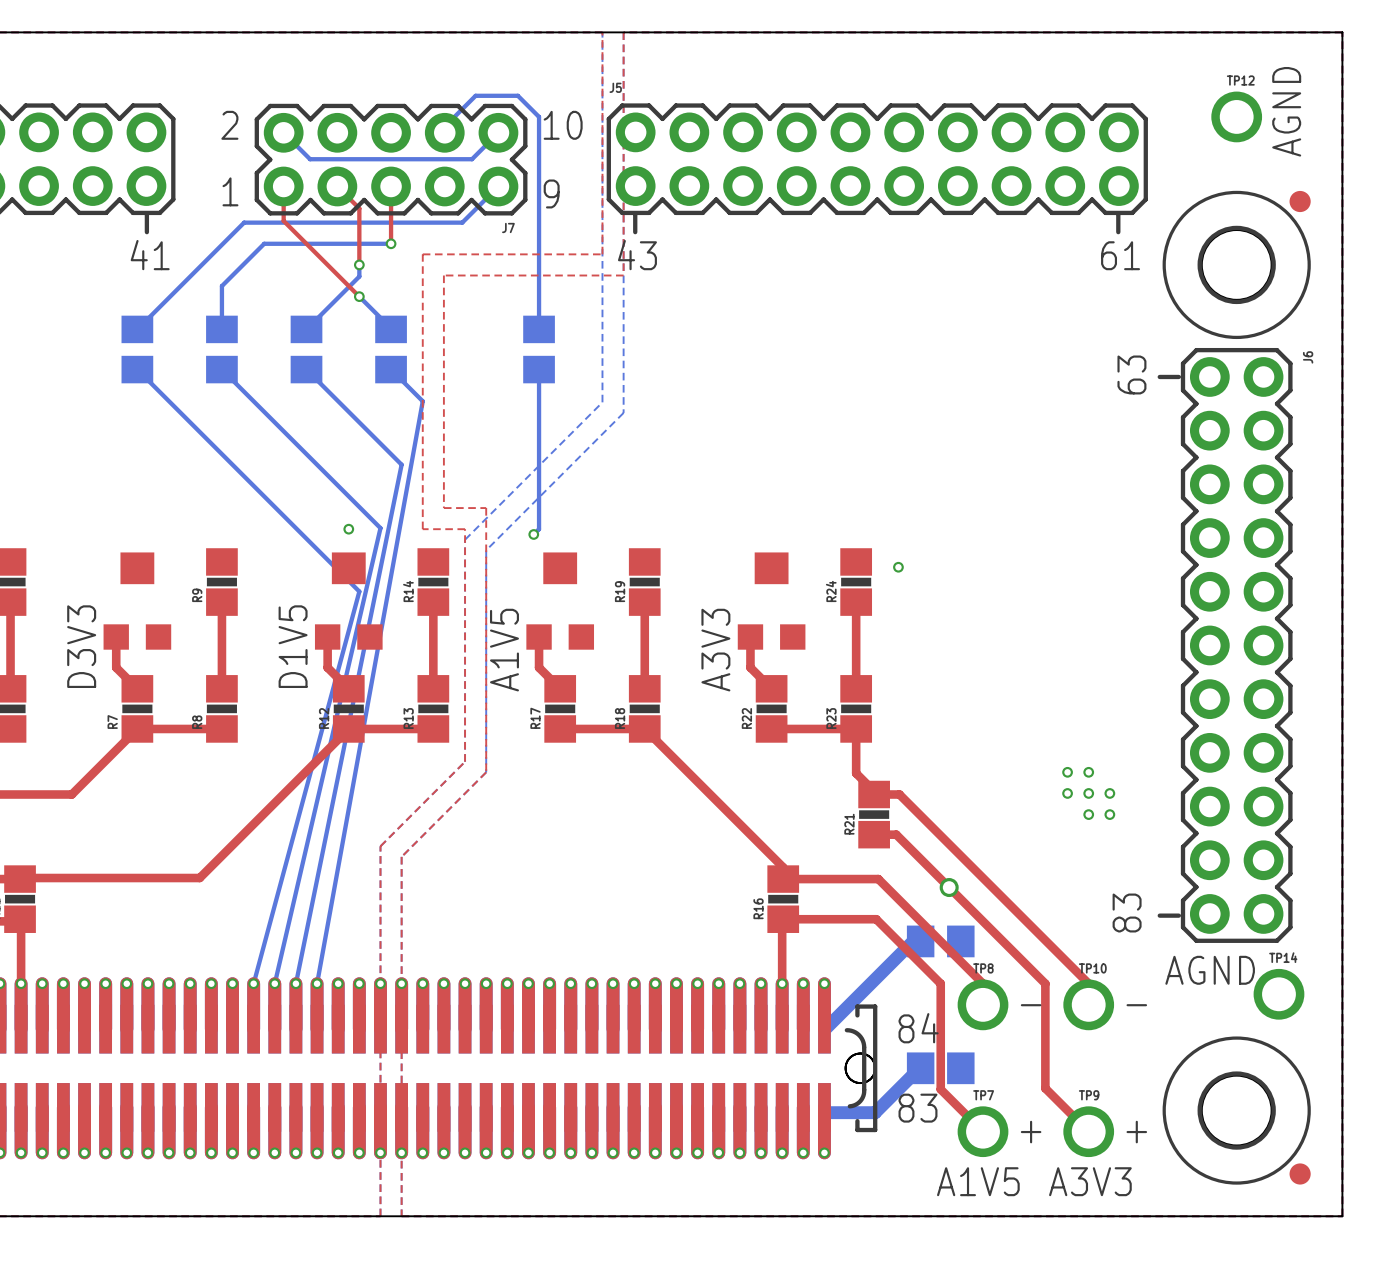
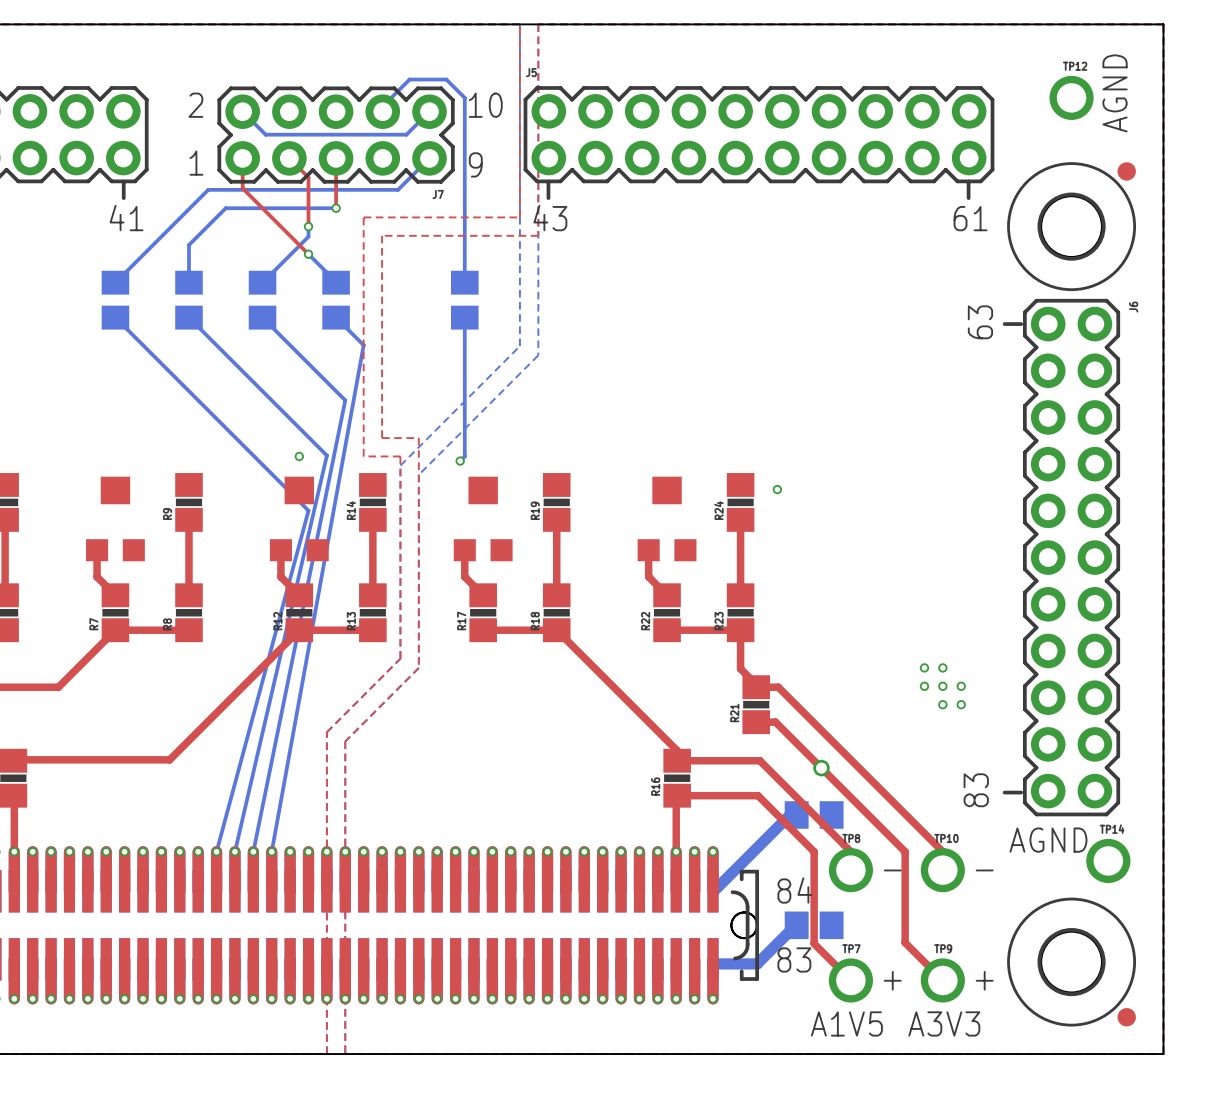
text: D3V3 (81, 646) -> none
text: D1V5 (293, 646) -> none
text: A1V5 (504, 650) -> none
text: A3V3 (715, 650) -> none

